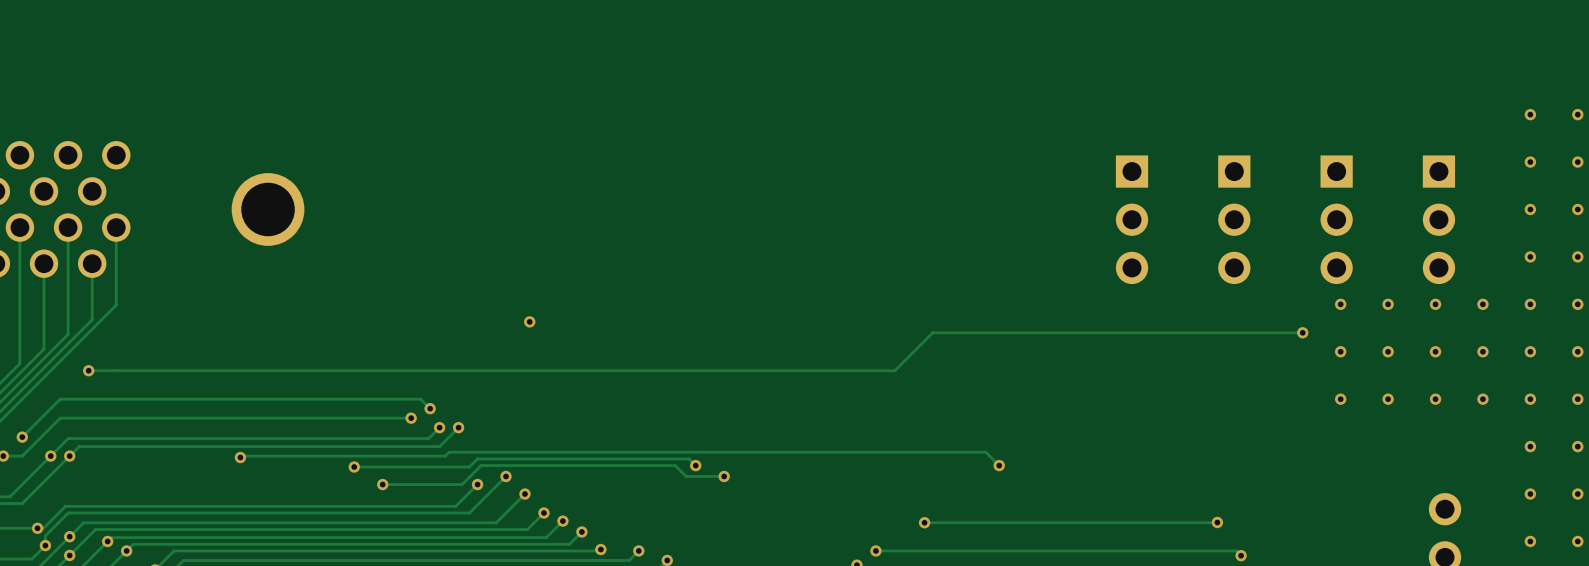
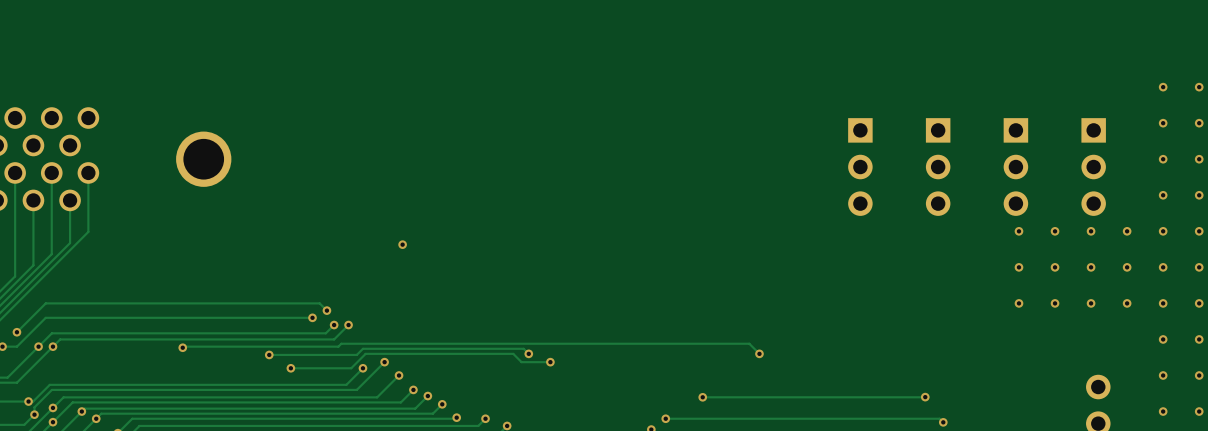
track: (1302, 332) (932, 332) (894, 370) (88, 370) -> none
via: (1302, 332) -> none
via: (88, 370) -> none

